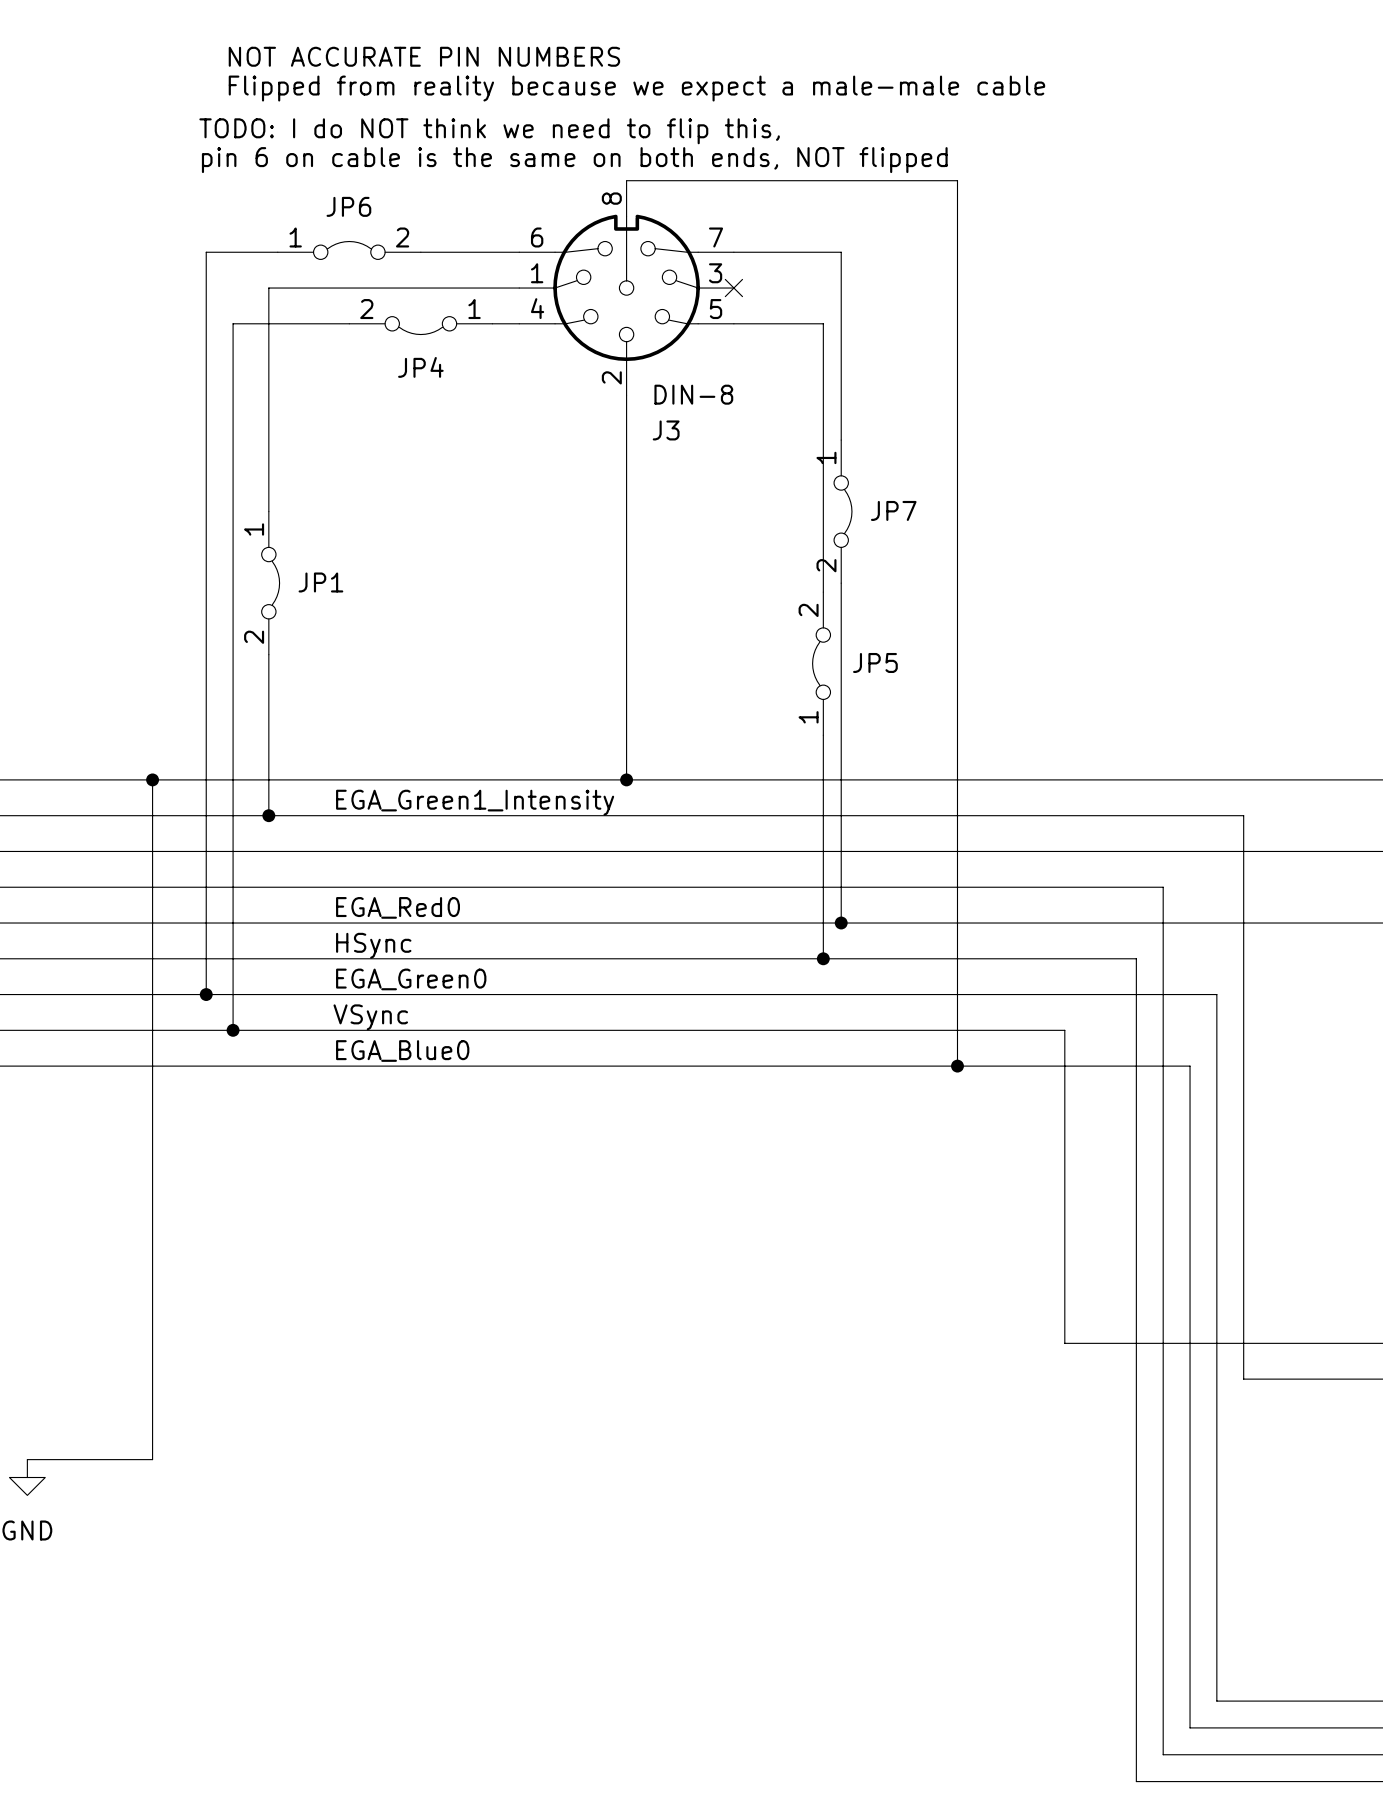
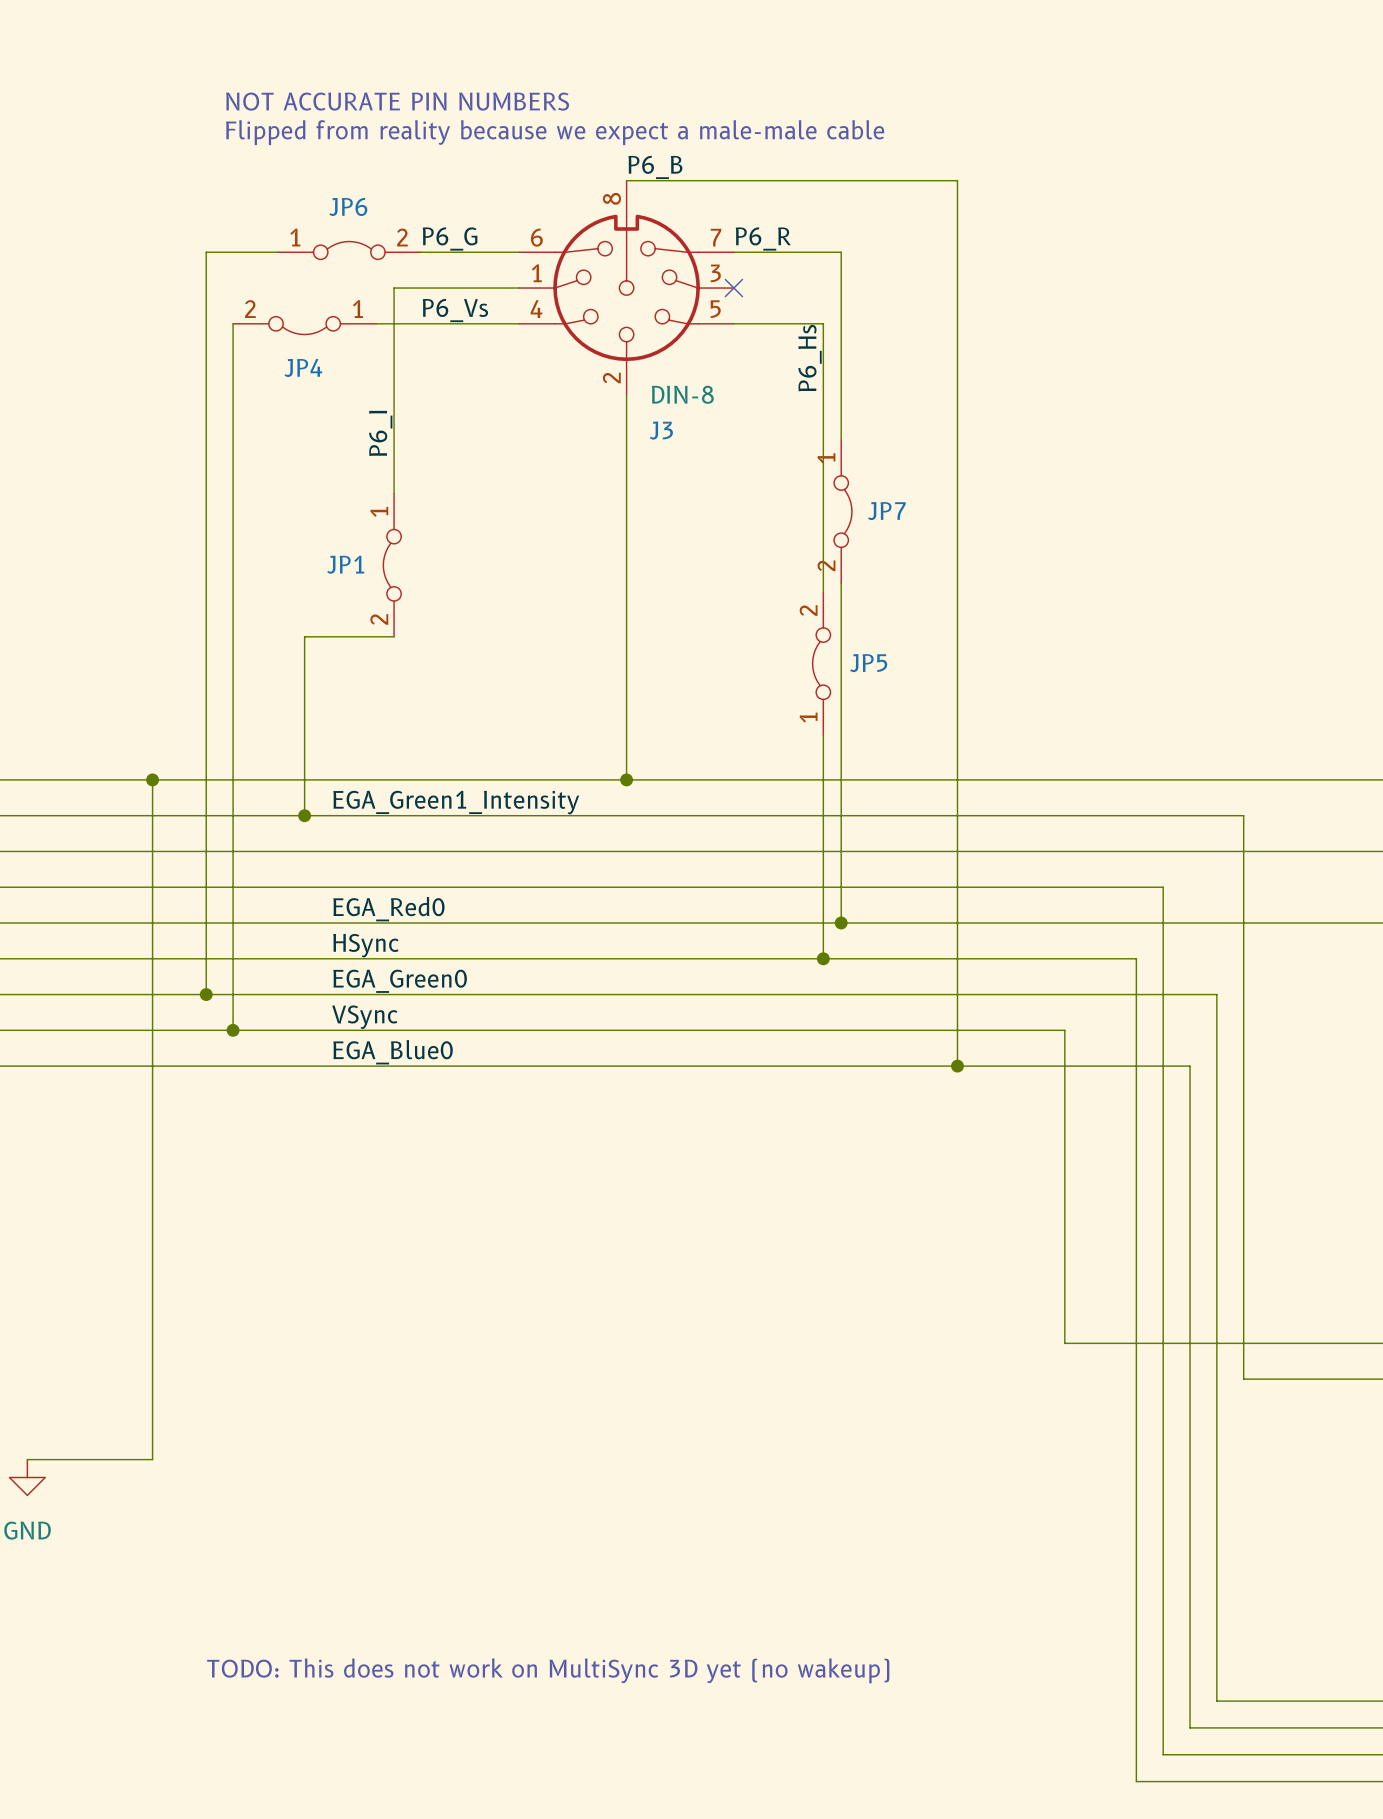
text position: NOT ACCURATE PIN NUMBERS (424, 56) -> NOT ACCURATE PIN NUMBERS (397, 101)
text position: Flipped from reality because we expect a male-male cable (636, 88) -> Flipped from reality because we expect a male-male cable (555, 132)
text: TODO: I do NOT think we need to flip this, (489, 131) -> none
text: pin 6 on cable is the same on both ends, NOT flipped (574, 160) -> none
label: none -> P6_B (655, 167)
label: none -> P6_G (450, 238)
label: none -> P6_R (763, 238)
wire: (394, 288) (268, 288) (268, 511) -> (394, 288) (394, 493)
label: none -> P6_Vs (455, 310)
wire: (233, 323) (349, 323) -> (376, 323) (492, 323)
JP4 position: (420, 325) -> (304, 325)
label: none -> P6_Hs (810, 358)
label: none -> P6_I (380, 433)
JP1 flip: as is (270, 583) -> left-right (392, 565)
JP1 position: (270, 583) -> (392, 565)
wire: none -> (394, 636) (304, 636) (304, 815)
wire: (268, 654) (268, 815) -> none
junction position: (268, 815) -> (304, 815)
text: none -> TODO: This does not work on MultiSync 3D yet (no wakeup) (548, 1670)

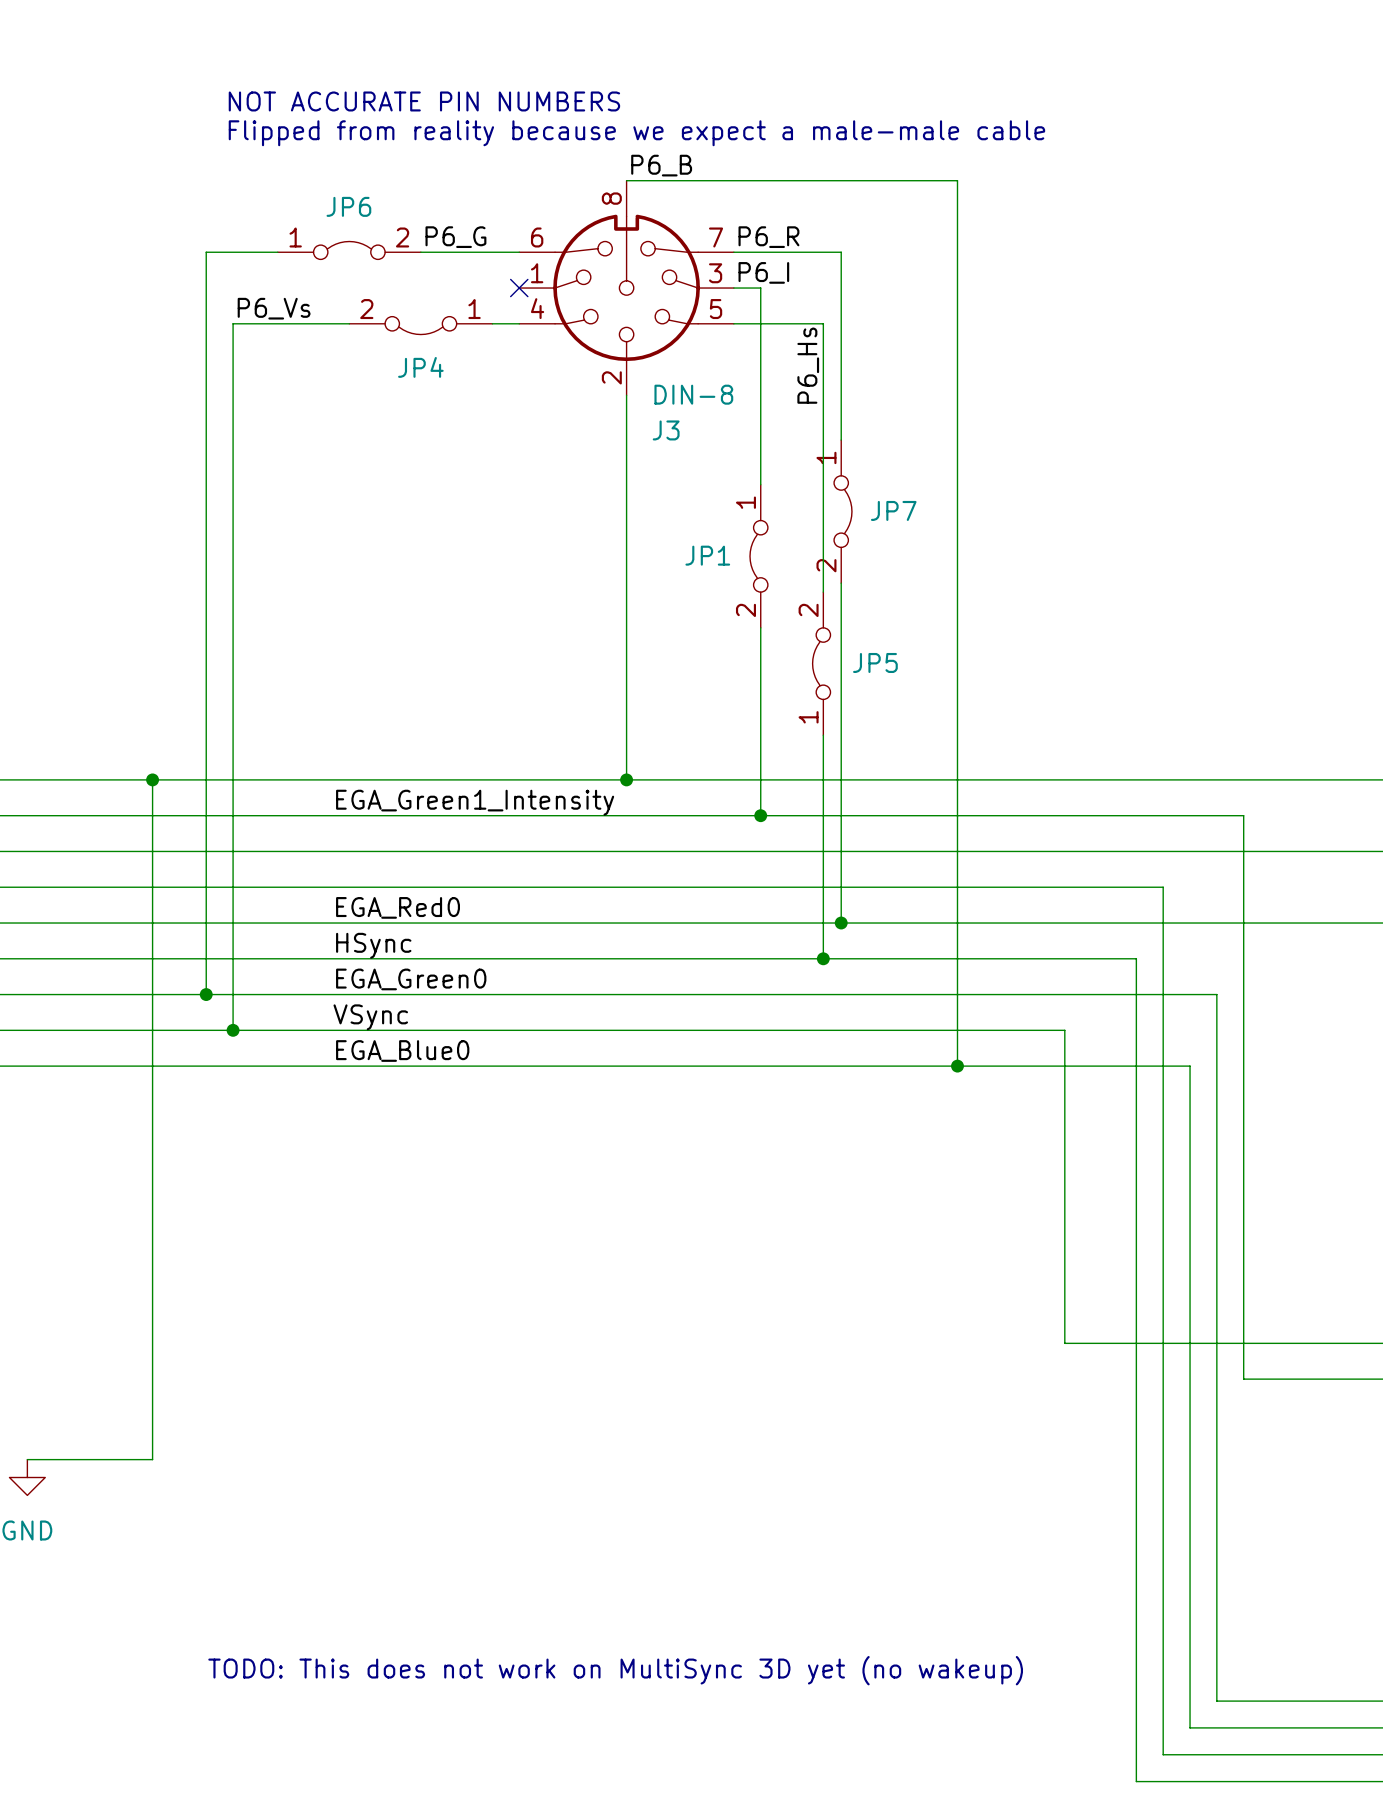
label: none -> P6_I (763, 272)
wire: (519, 288) (394, 288) (394, 493) -> none
no-connect mark: none -> (519, 288)
wire: none -> (733, 288) (760, 288) (760, 484)
no-connect mark: (733, 288) -> none
label position: P6_Vs (455, 310) -> P6_Vs (274, 308)
wire: (376, 323) (492, 323) -> (233, 323) (349, 323)
JP4 position: (304, 325) -> (420, 325)
label: P6_I (380, 433) -> none
JP1 position: (392, 565) -> (758, 556)
wire: none -> (760, 627) (760, 815)
wire: (394, 636) (304, 636) (304, 815) -> none
junction: (304, 815) -> none
junction: none -> (760, 815)

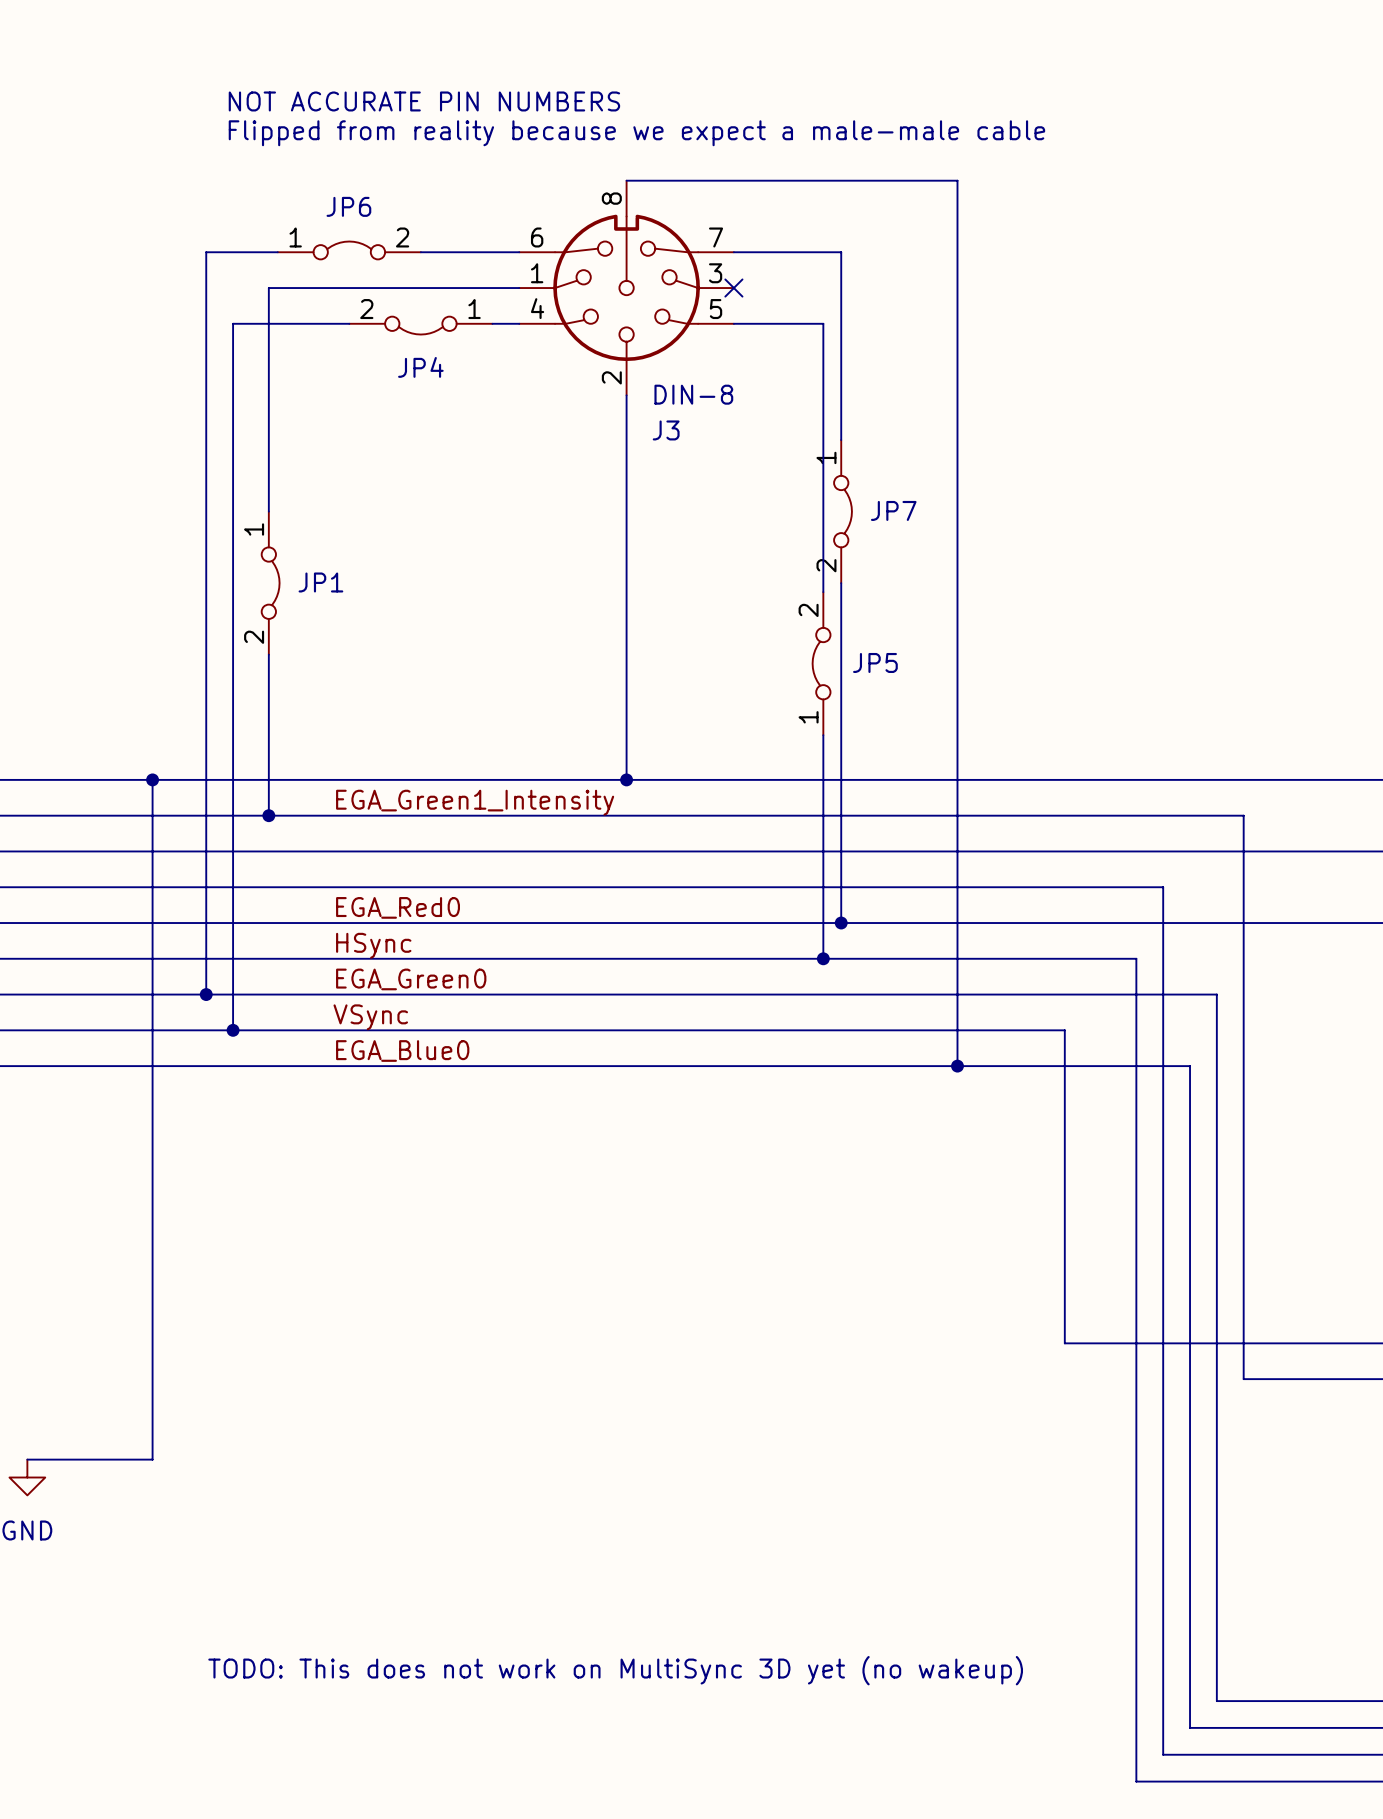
label: P6_B (661, 165) -> none
label: P6_G (455, 237) -> none
label: P6_R (768, 237) -> none
label: P6_I (763, 272) -> none
wire: none -> (519, 288) (268, 288) (268, 511)
no-connect mark: (519, 288) -> none
wire: (733, 288) (760, 288) (760, 484) -> none
no-connect mark: none -> (733, 288)
label: P6_Vs (274, 308) -> none
label: P6_Hs (808, 365) -> none
JP1 flip: as is (758, 556) -> left-right (270, 583)
JP1 position: (758, 556) -> (270, 583)
wire: (760, 627) (760, 815) -> none
wire: none -> (268, 654) (268, 815)
junction: none -> (268, 815)
junction: (760, 815) -> none

